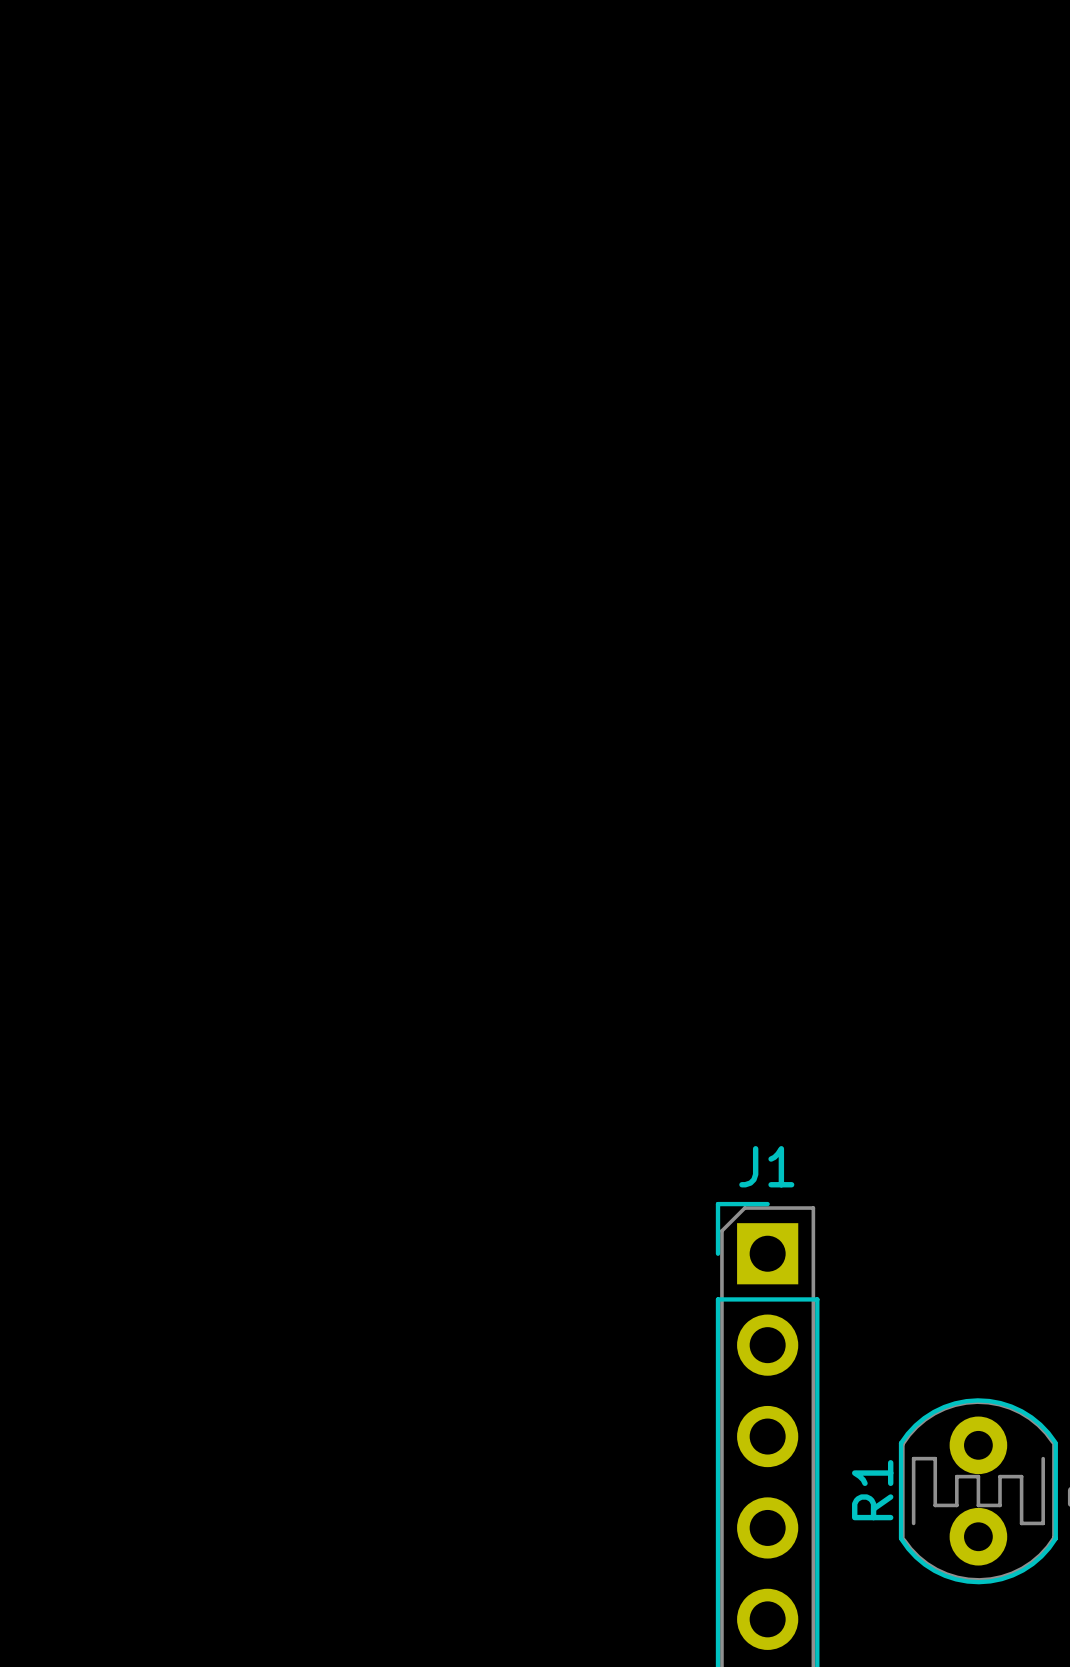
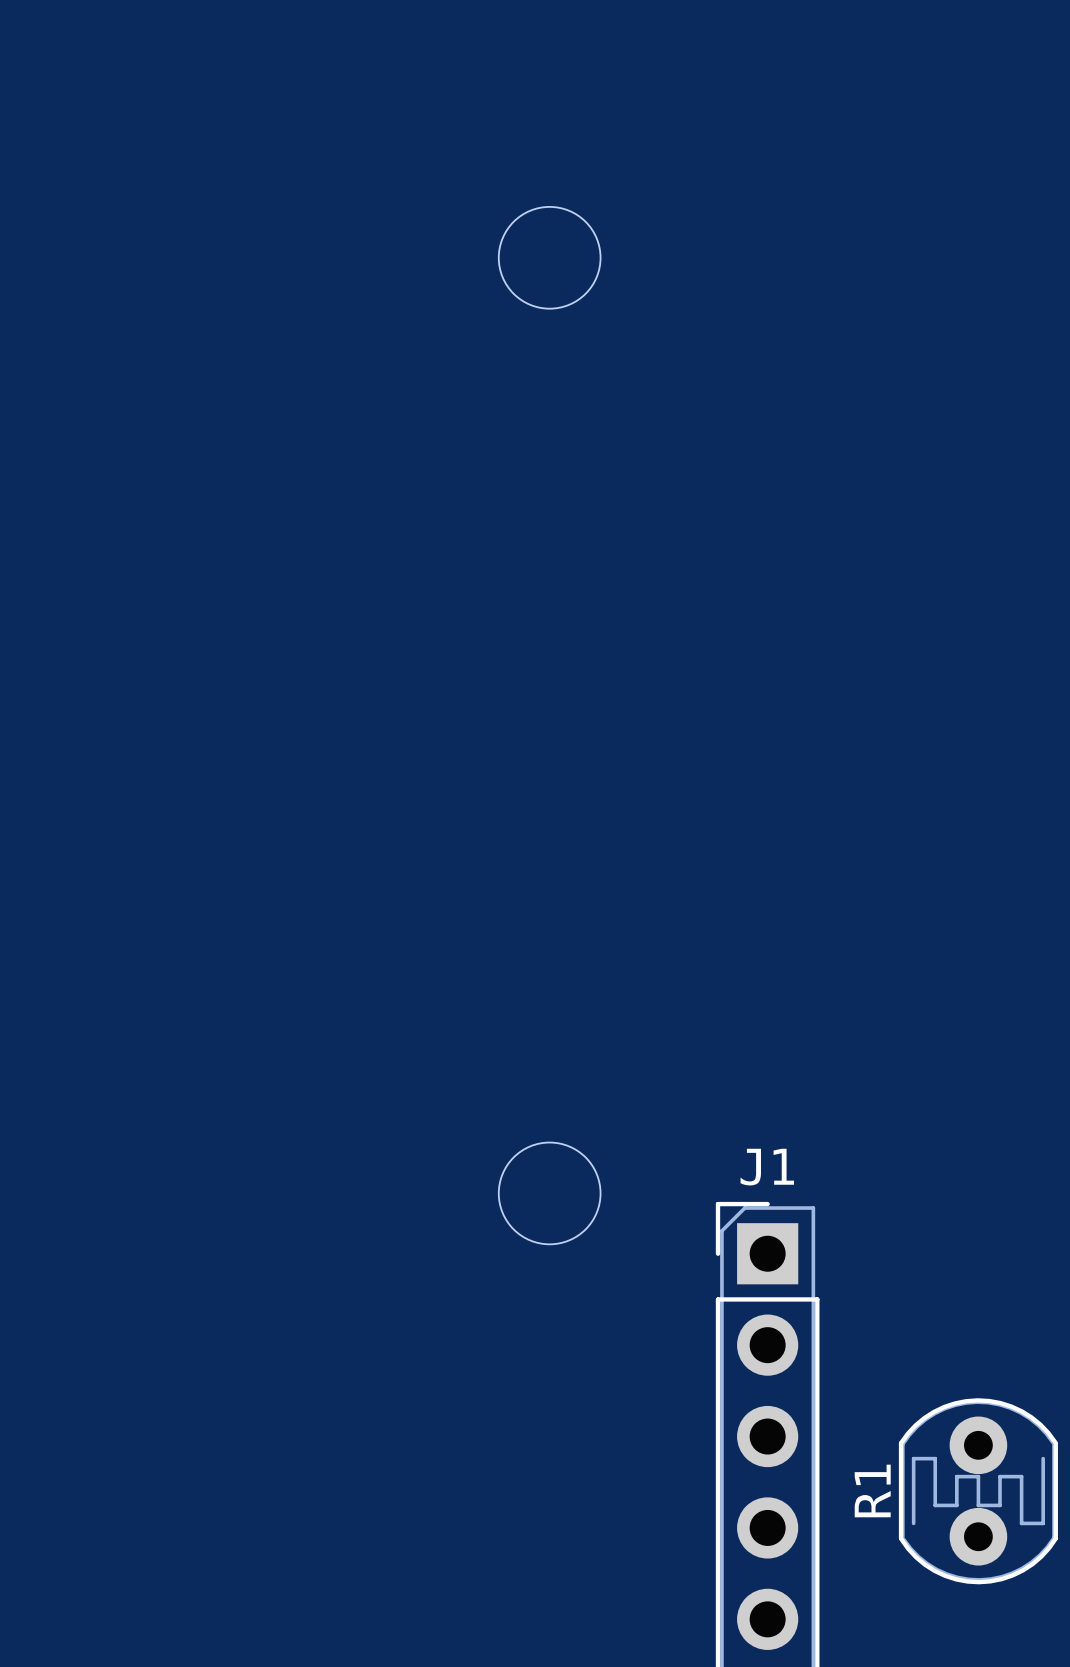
round board edge: none -> [497, 206, 602, 310]
round board edge: none -> [497, 1141, 602, 1246]

